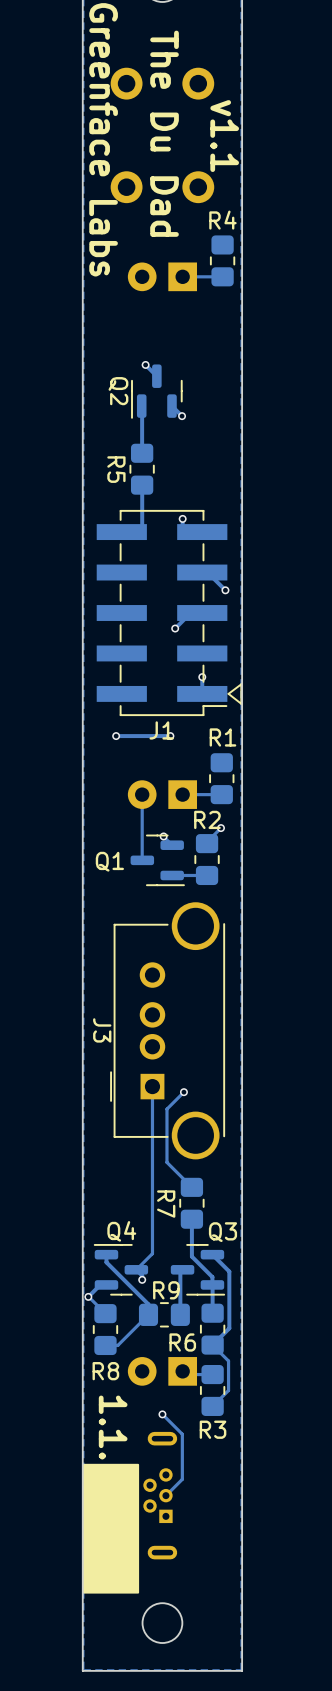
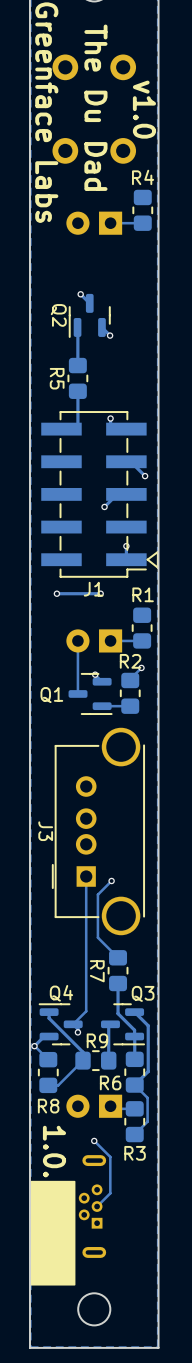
text: v1.1 (224, 136) -> v1.0 (144, 109)
text: 1.1. (113, 1427) -> 1.0. (54, 1151)

